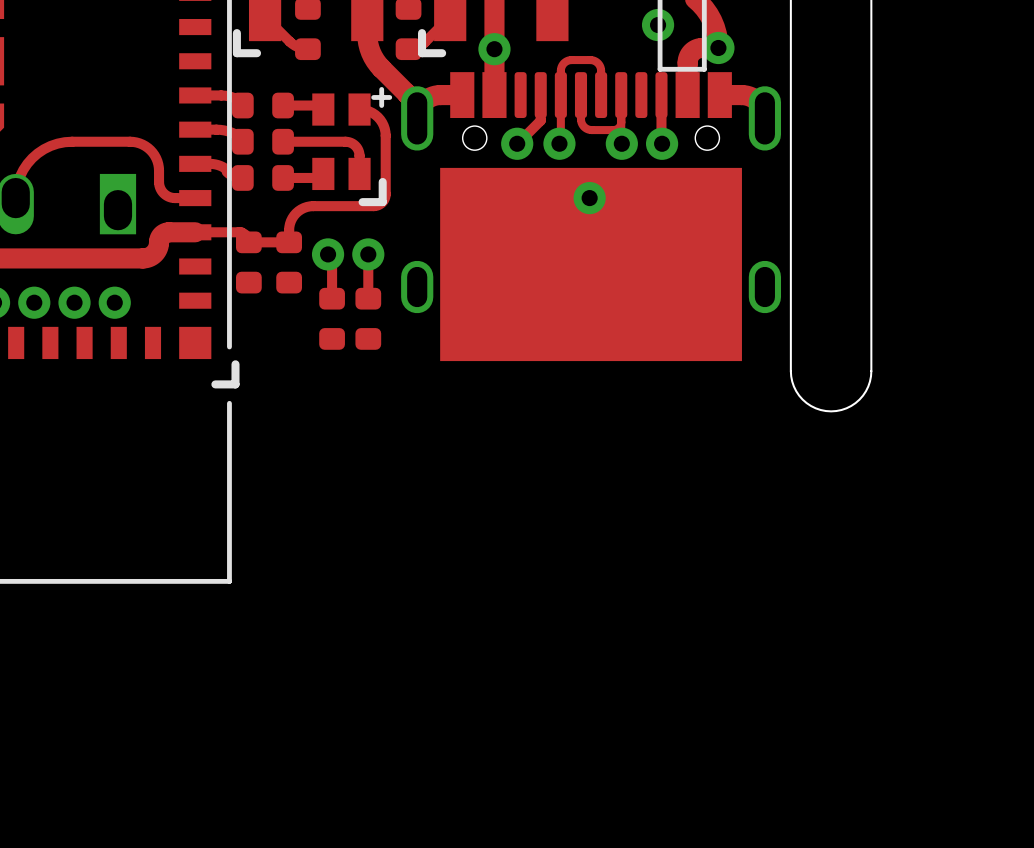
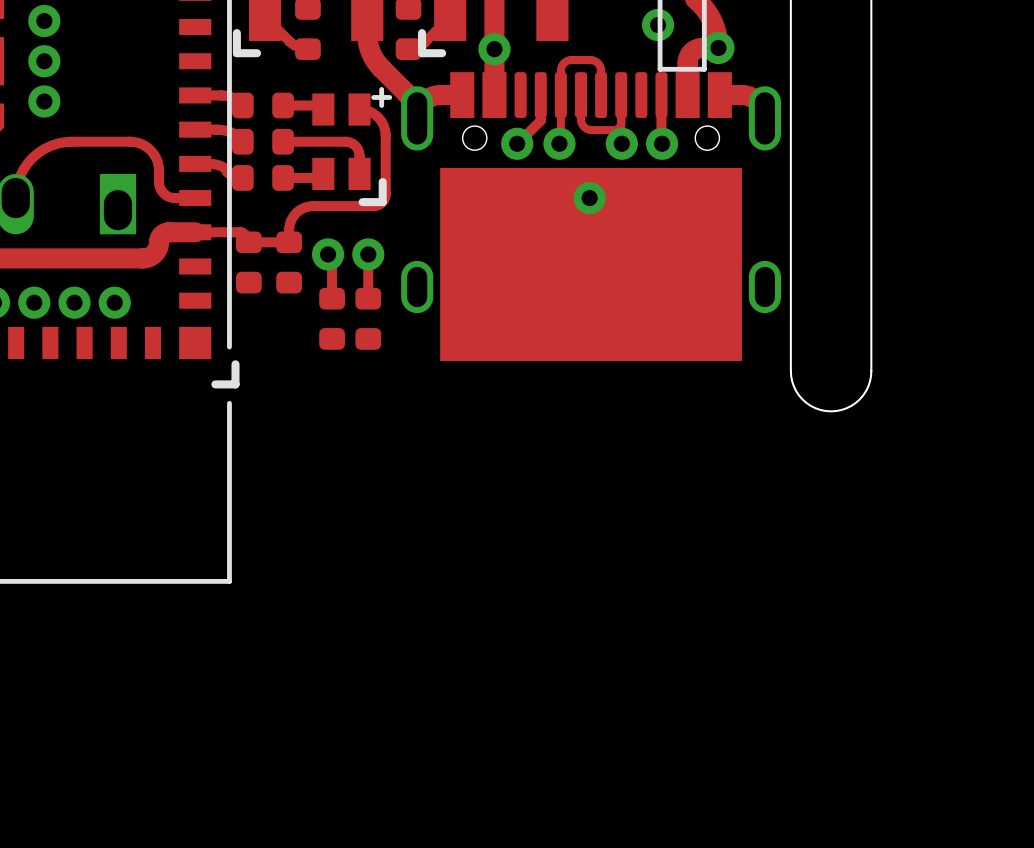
via: none -> (44, 21)
via: none -> (44, 61)
via: none -> (44, 101)

